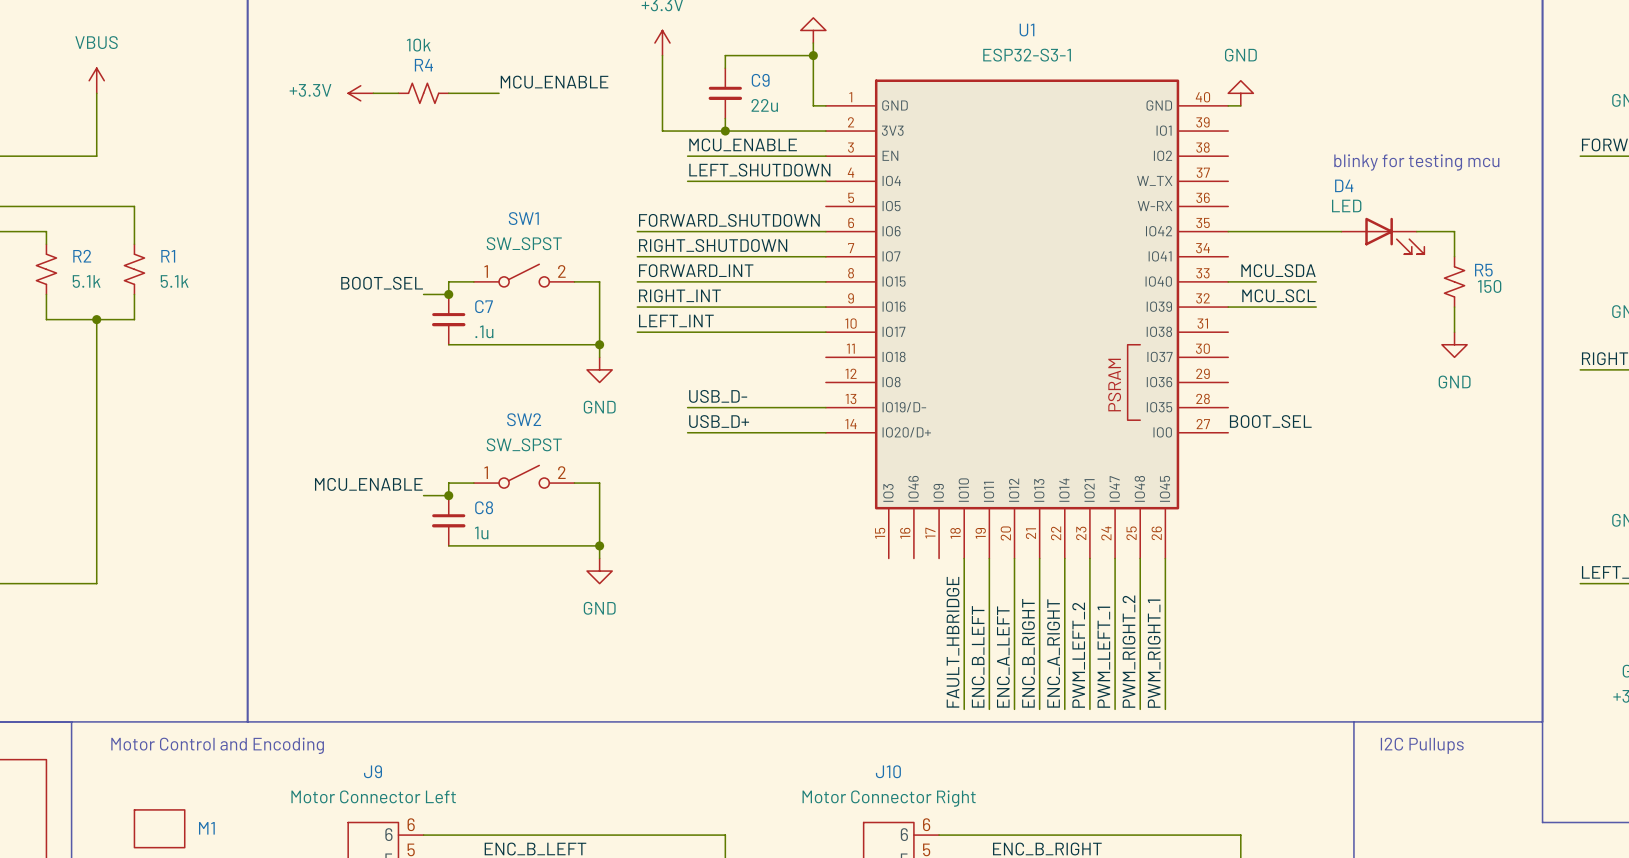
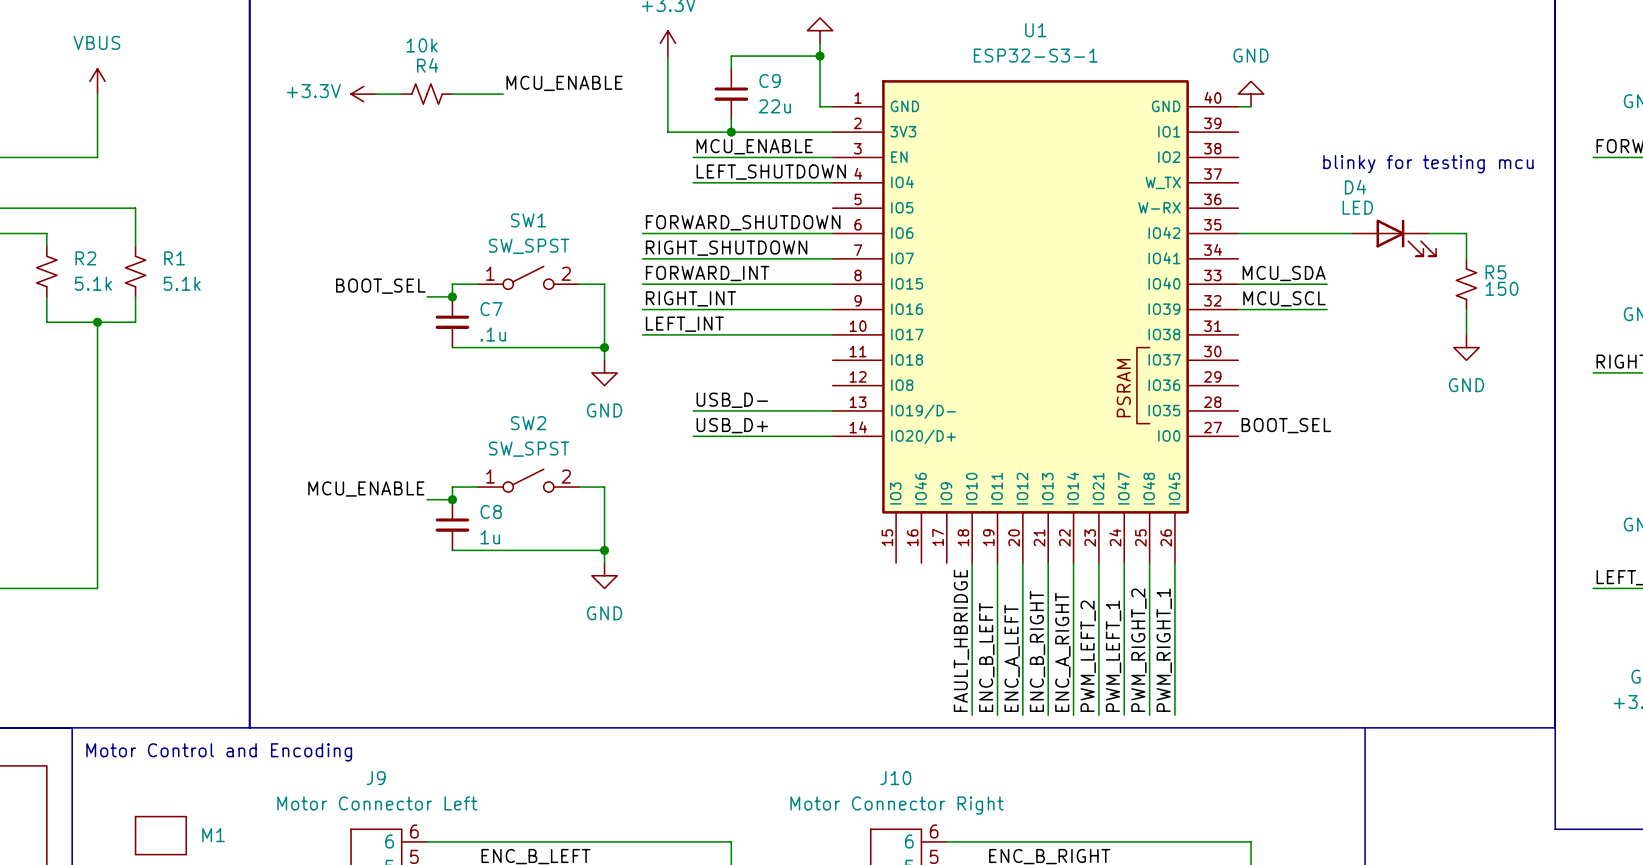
text: I2C Pullups (1422, 745) -> none

